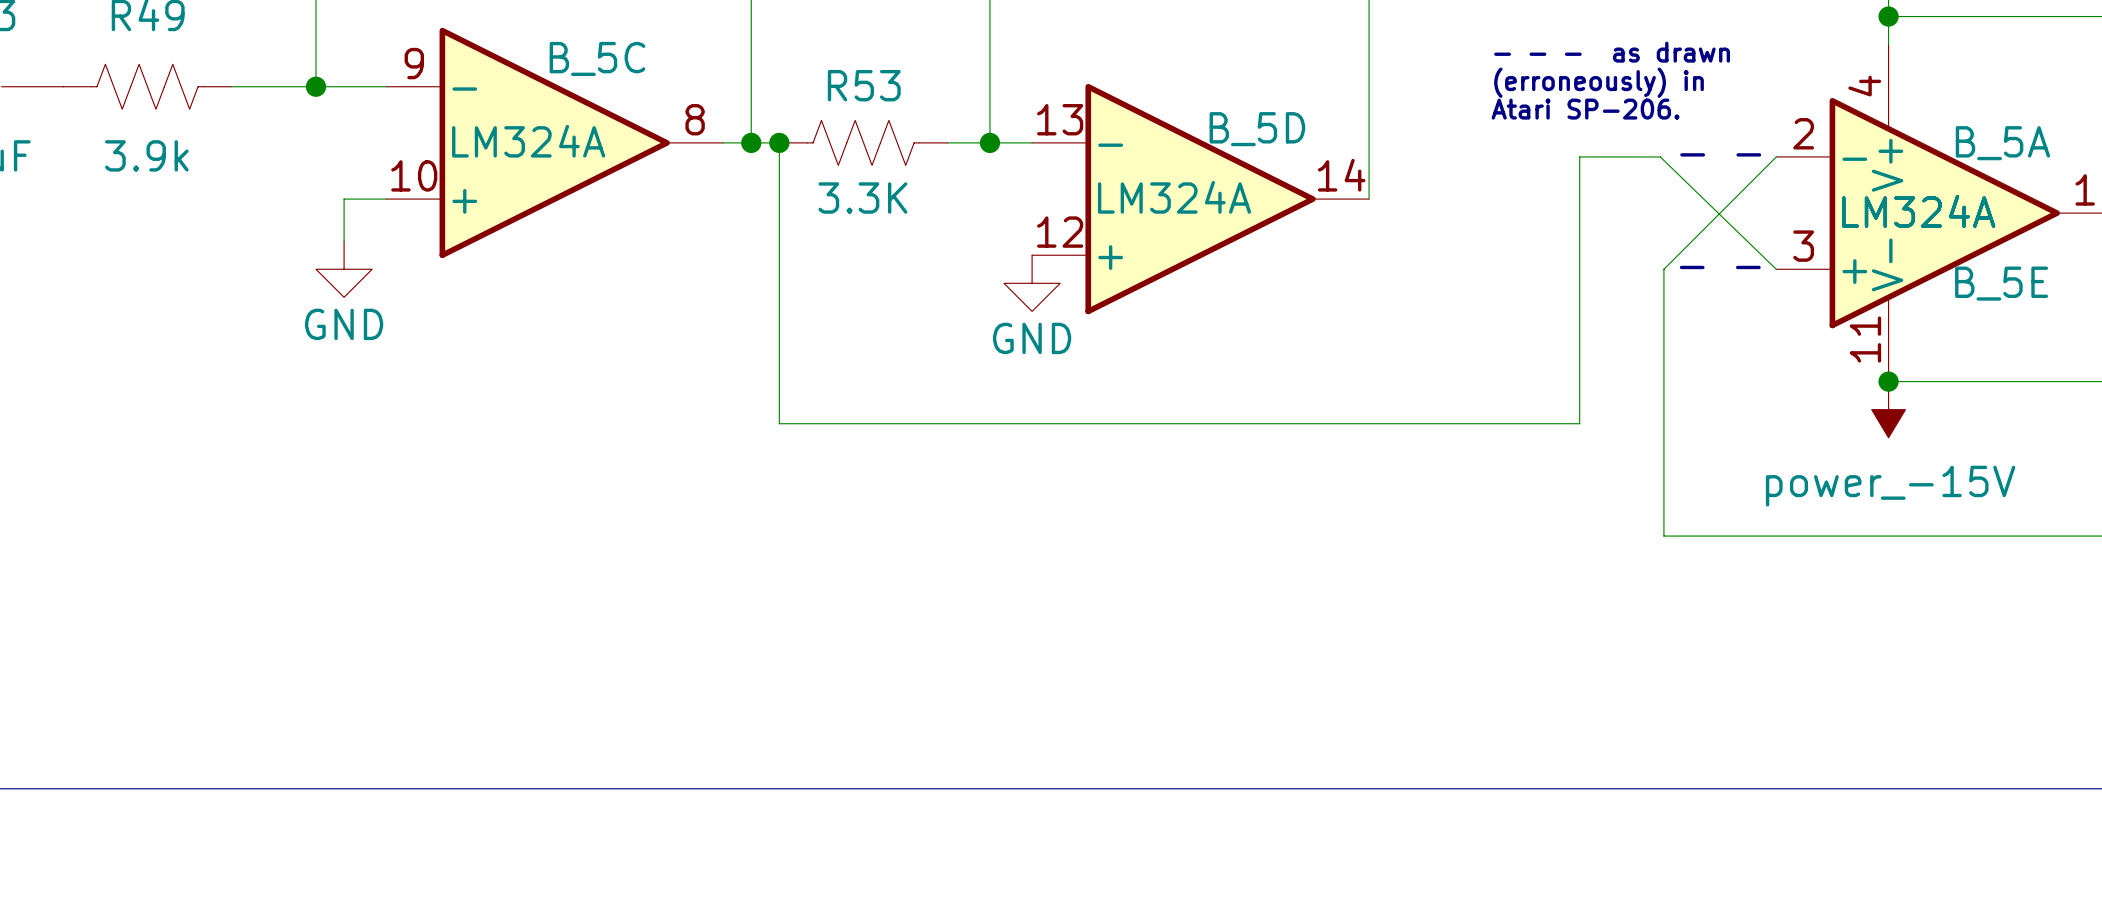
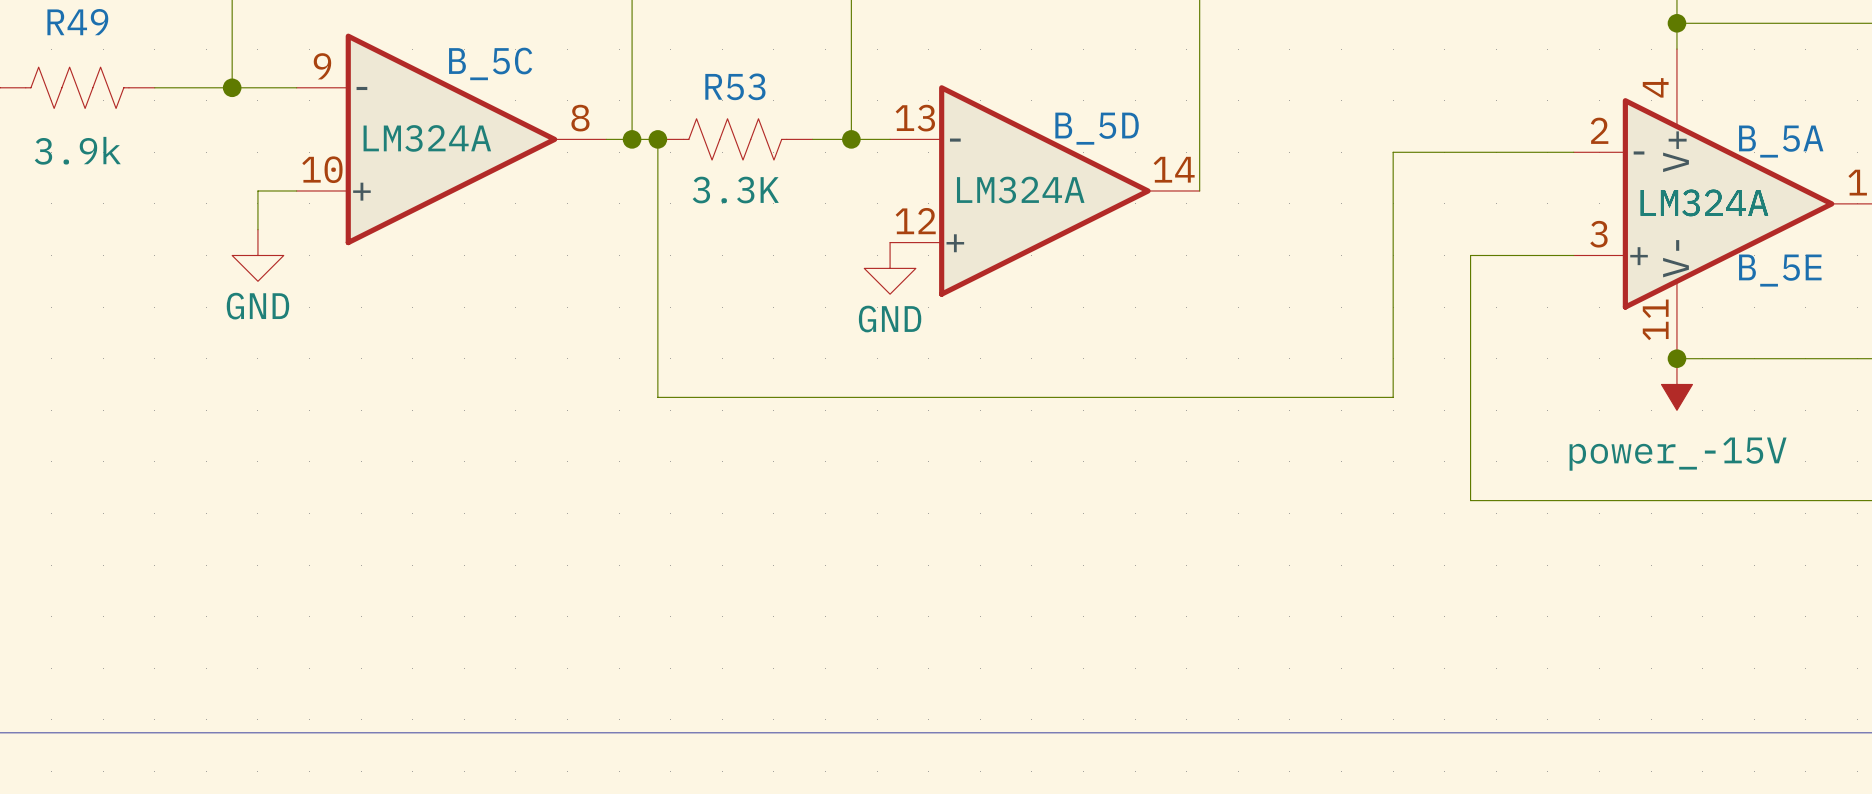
text: - - - as drawn (1612, 52) -> none
text: (erroneously) in (1599, 82) -> none
text: Atari SP-206. (1585, 109) -> none
text: - - (1720, 154) -> none
wire: (1579, 156) (1660, 157) (1776, 269) -> (1393, 152) (1573, 152)
wire: (1776, 156) (1663, 269) -> (1573, 255) (1470, 255)
text: - - (1720, 267) -> none

